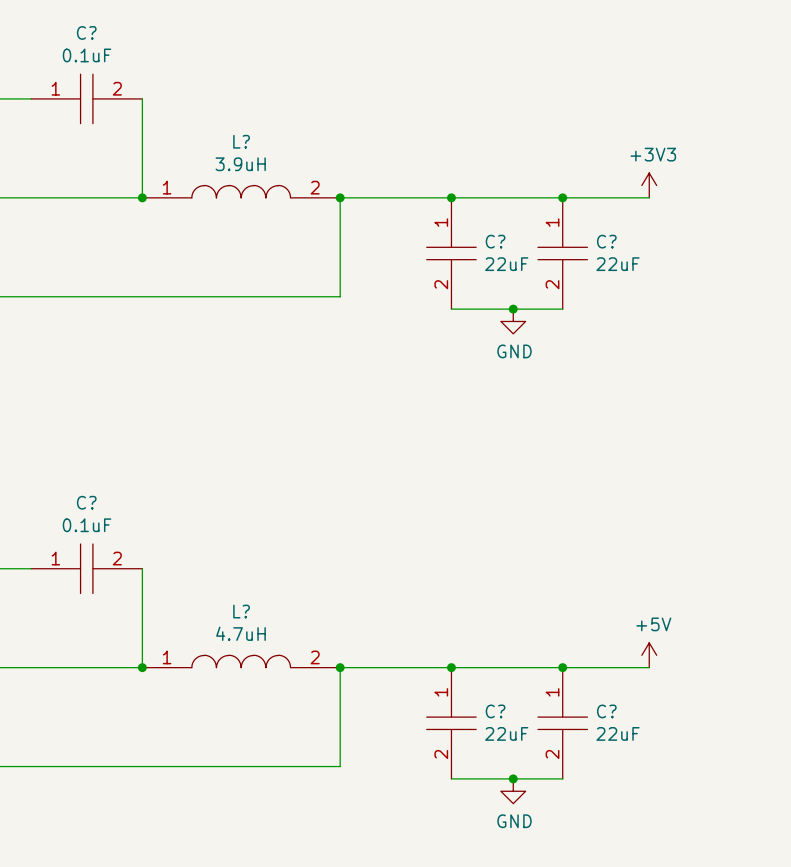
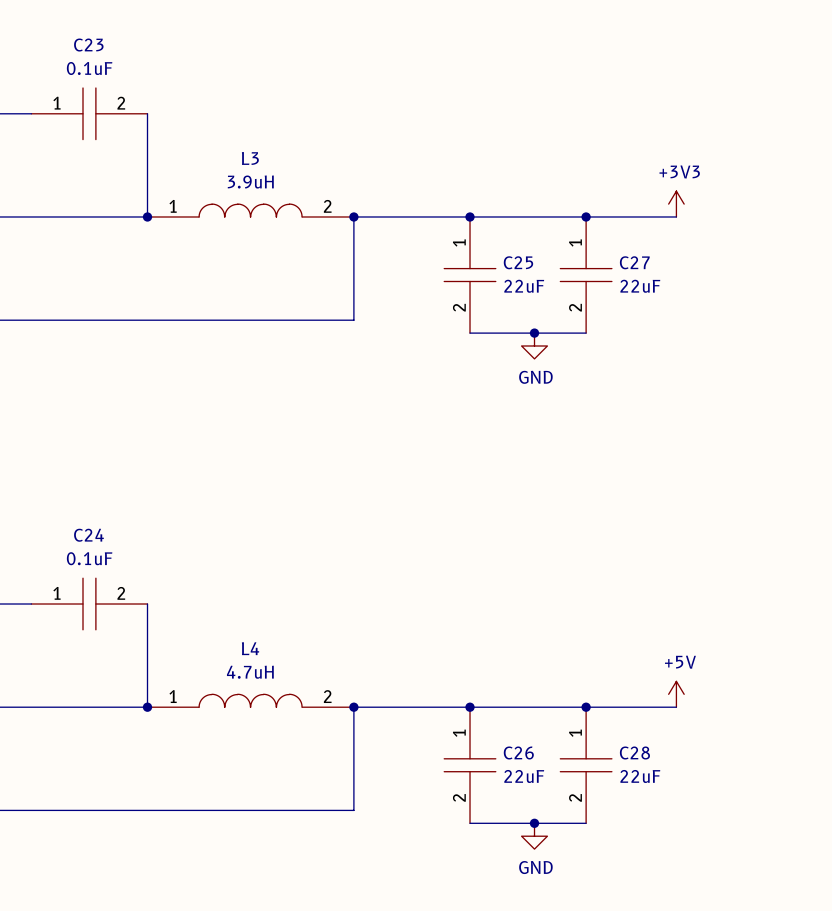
C? name: C? (86, 32) -> C23 (88, 45)
L? name: L? (241, 141) -> L3 (250, 158)
C? name: C? (495, 241) -> C25 (518, 262)
C? name: C? (606, 241) -> C27 (634, 262)
C? name: C? (86, 502) -> C24 (88, 535)
L? name: L? (241, 611) -> L4 (250, 648)
C? name: C? (495, 711) -> C26 (518, 752)
C? name: C? (606, 711) -> C28 (634, 752)

